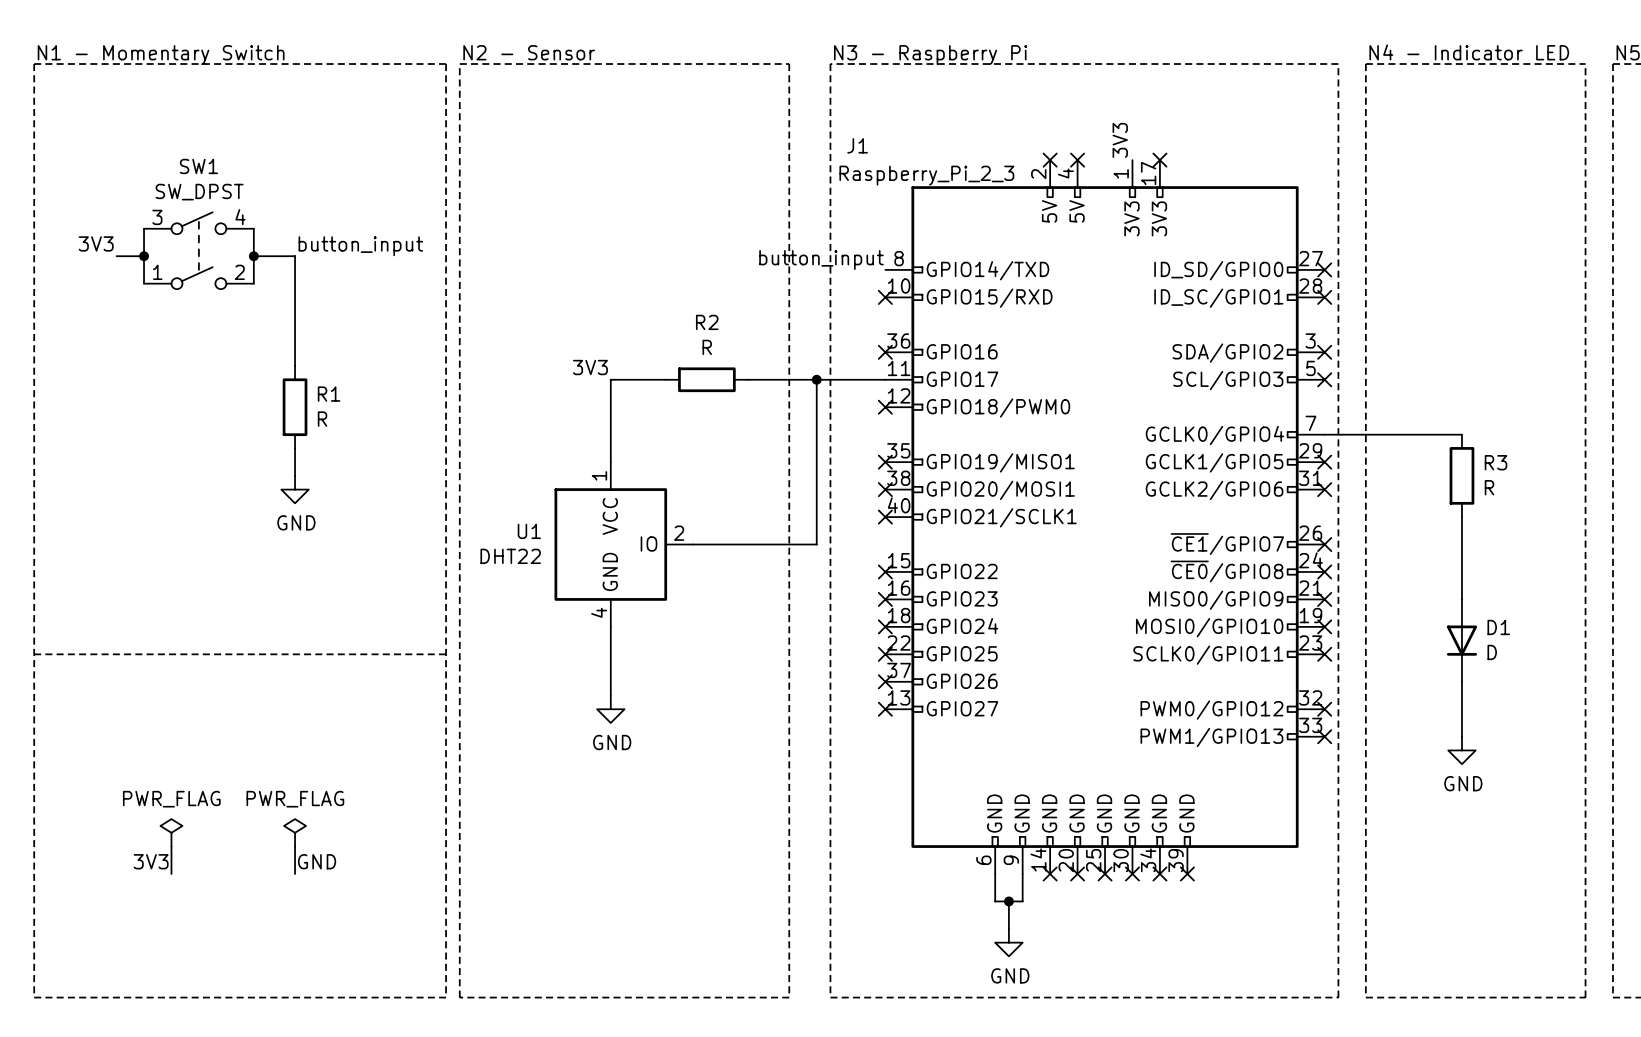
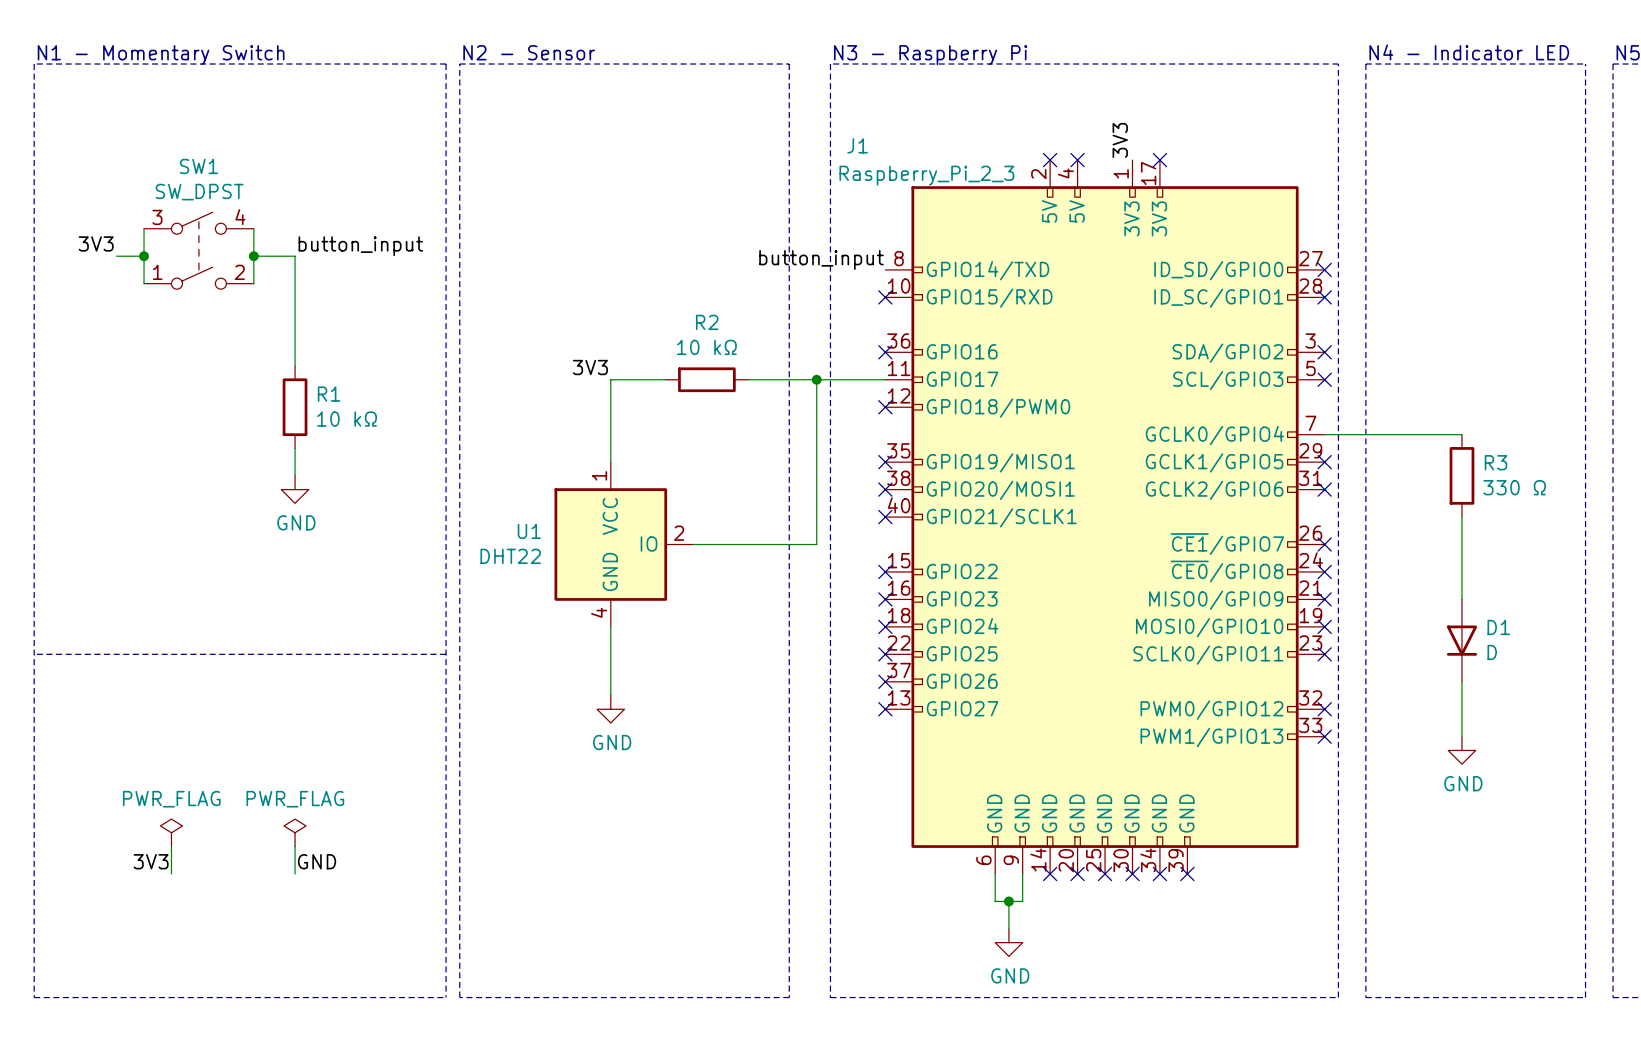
R2 value: R (707, 347) -> 10 kΩ (706, 347)
R1 value: R (322, 419) -> 10 kΩ (347, 419)
R3 value: R (1489, 487) -> 330 Ω (1514, 487)

